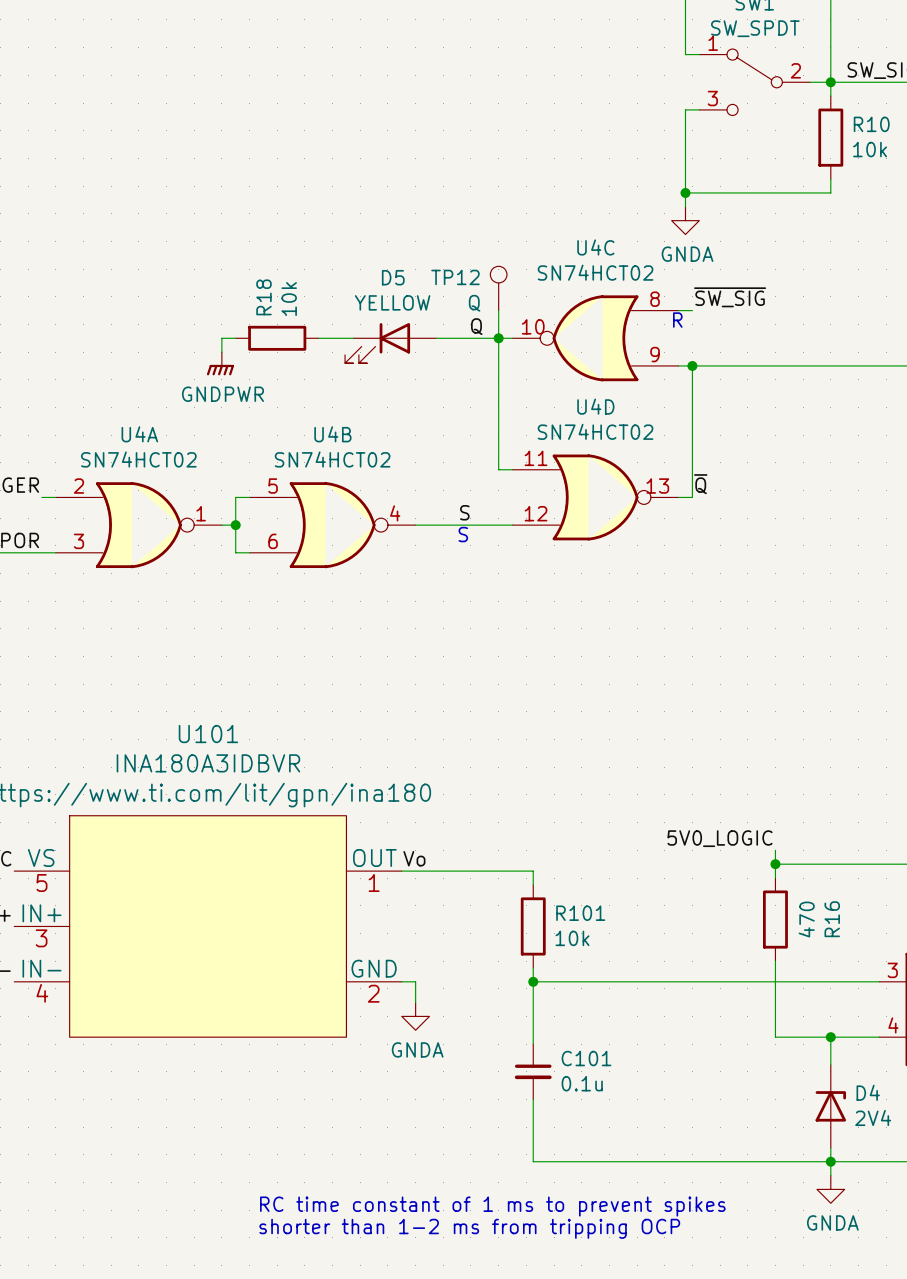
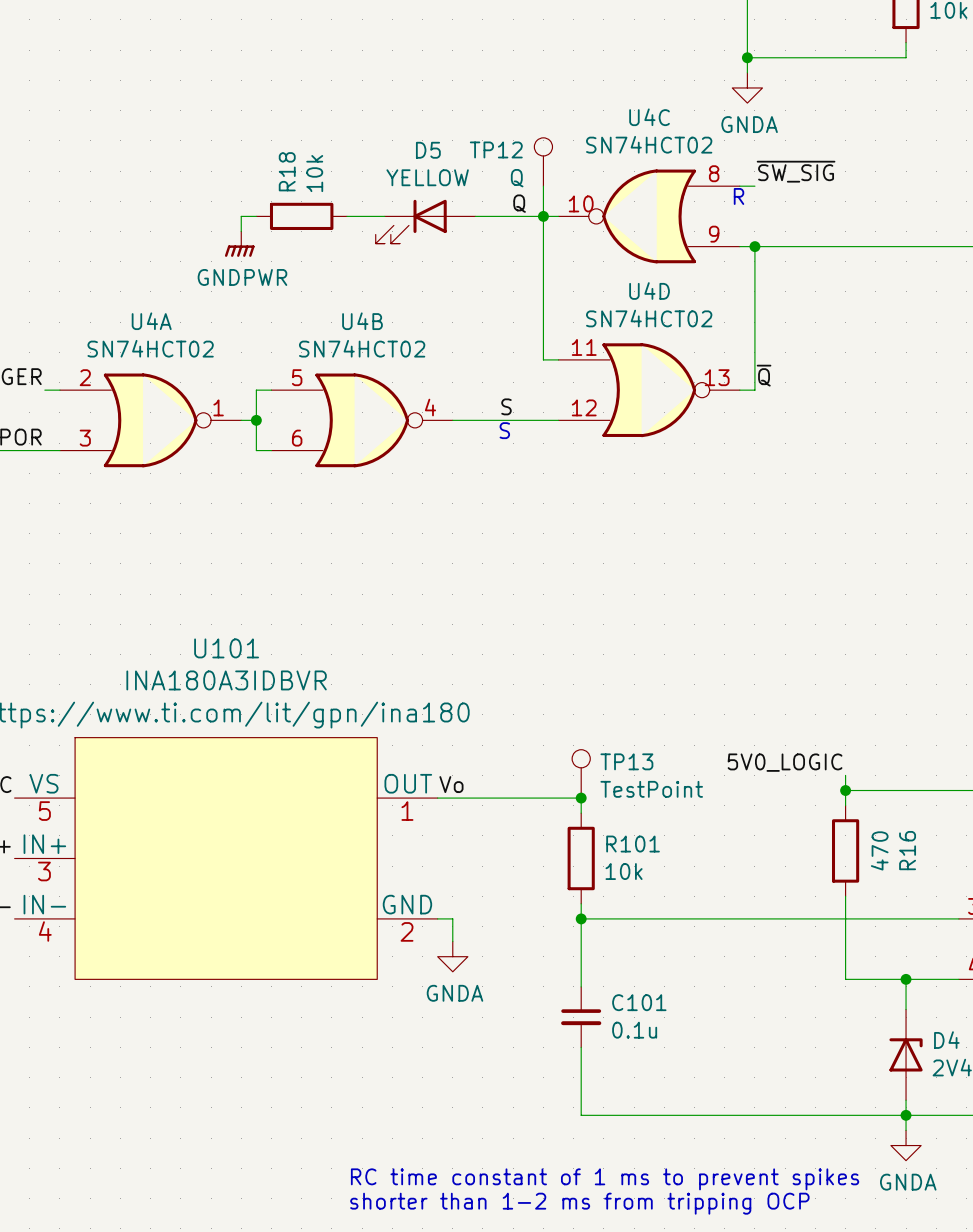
TP13: none -> TestPoint (581, 773)
junction: none -> (581, 798)
text position: RC time constant of 1 ms to prevent spikes (492, 1206) -> RC time constant of 1 ms to prevent spikes (605, 1179)
text position: shorter than 1-2 ms from tripping OCP (469, 1228) -> shorter than 1-2 ms from tripping OCP (579, 1203)

